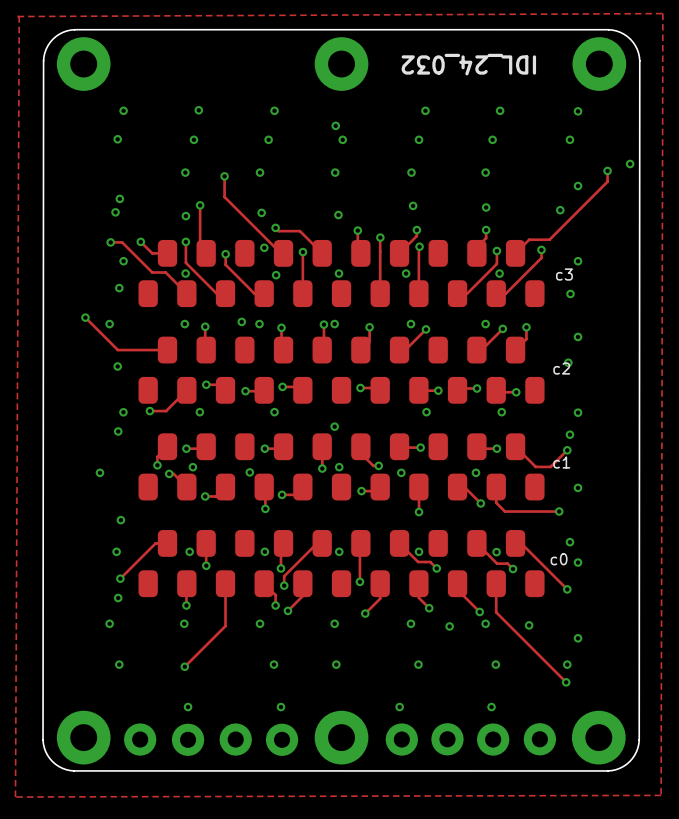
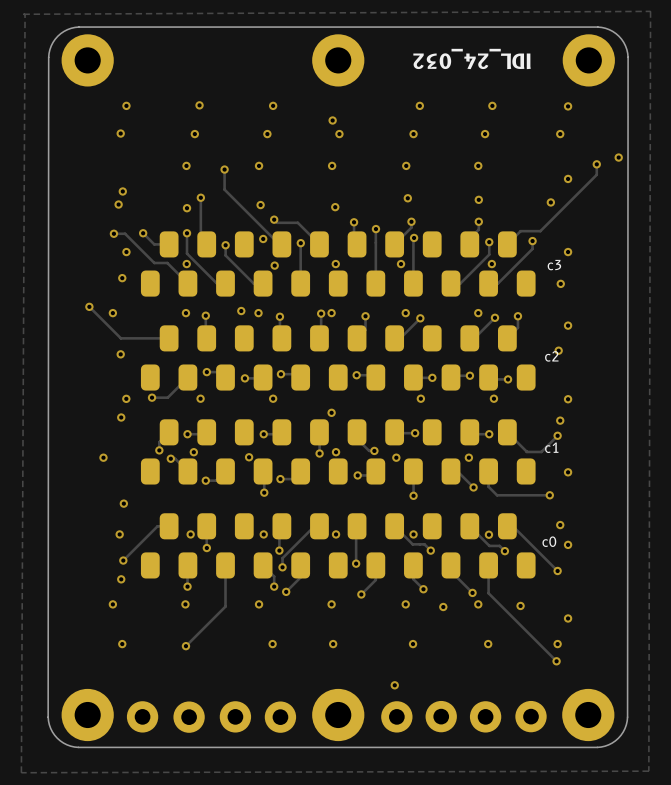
via: (188, 707) -> none
via: (280, 707) -> none
via: (491, 707) -> none

